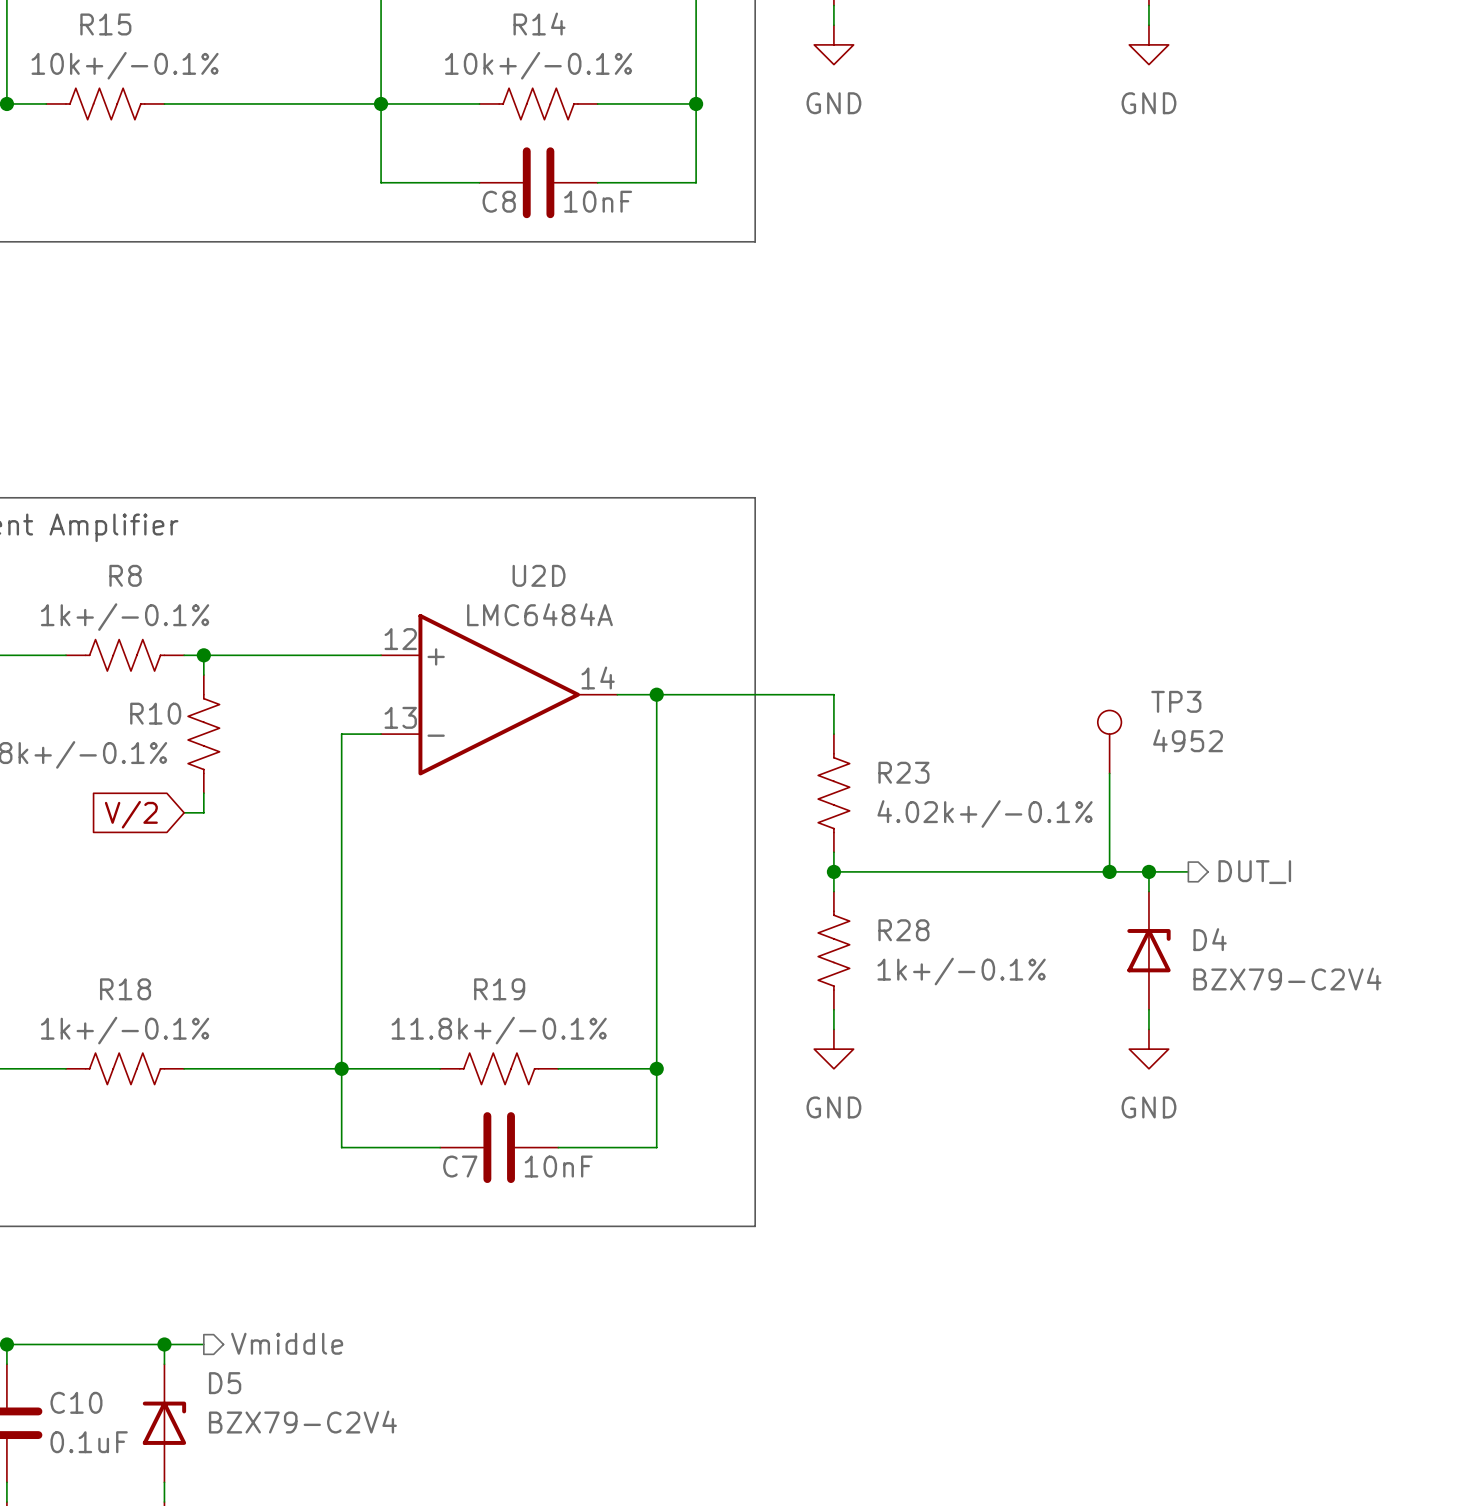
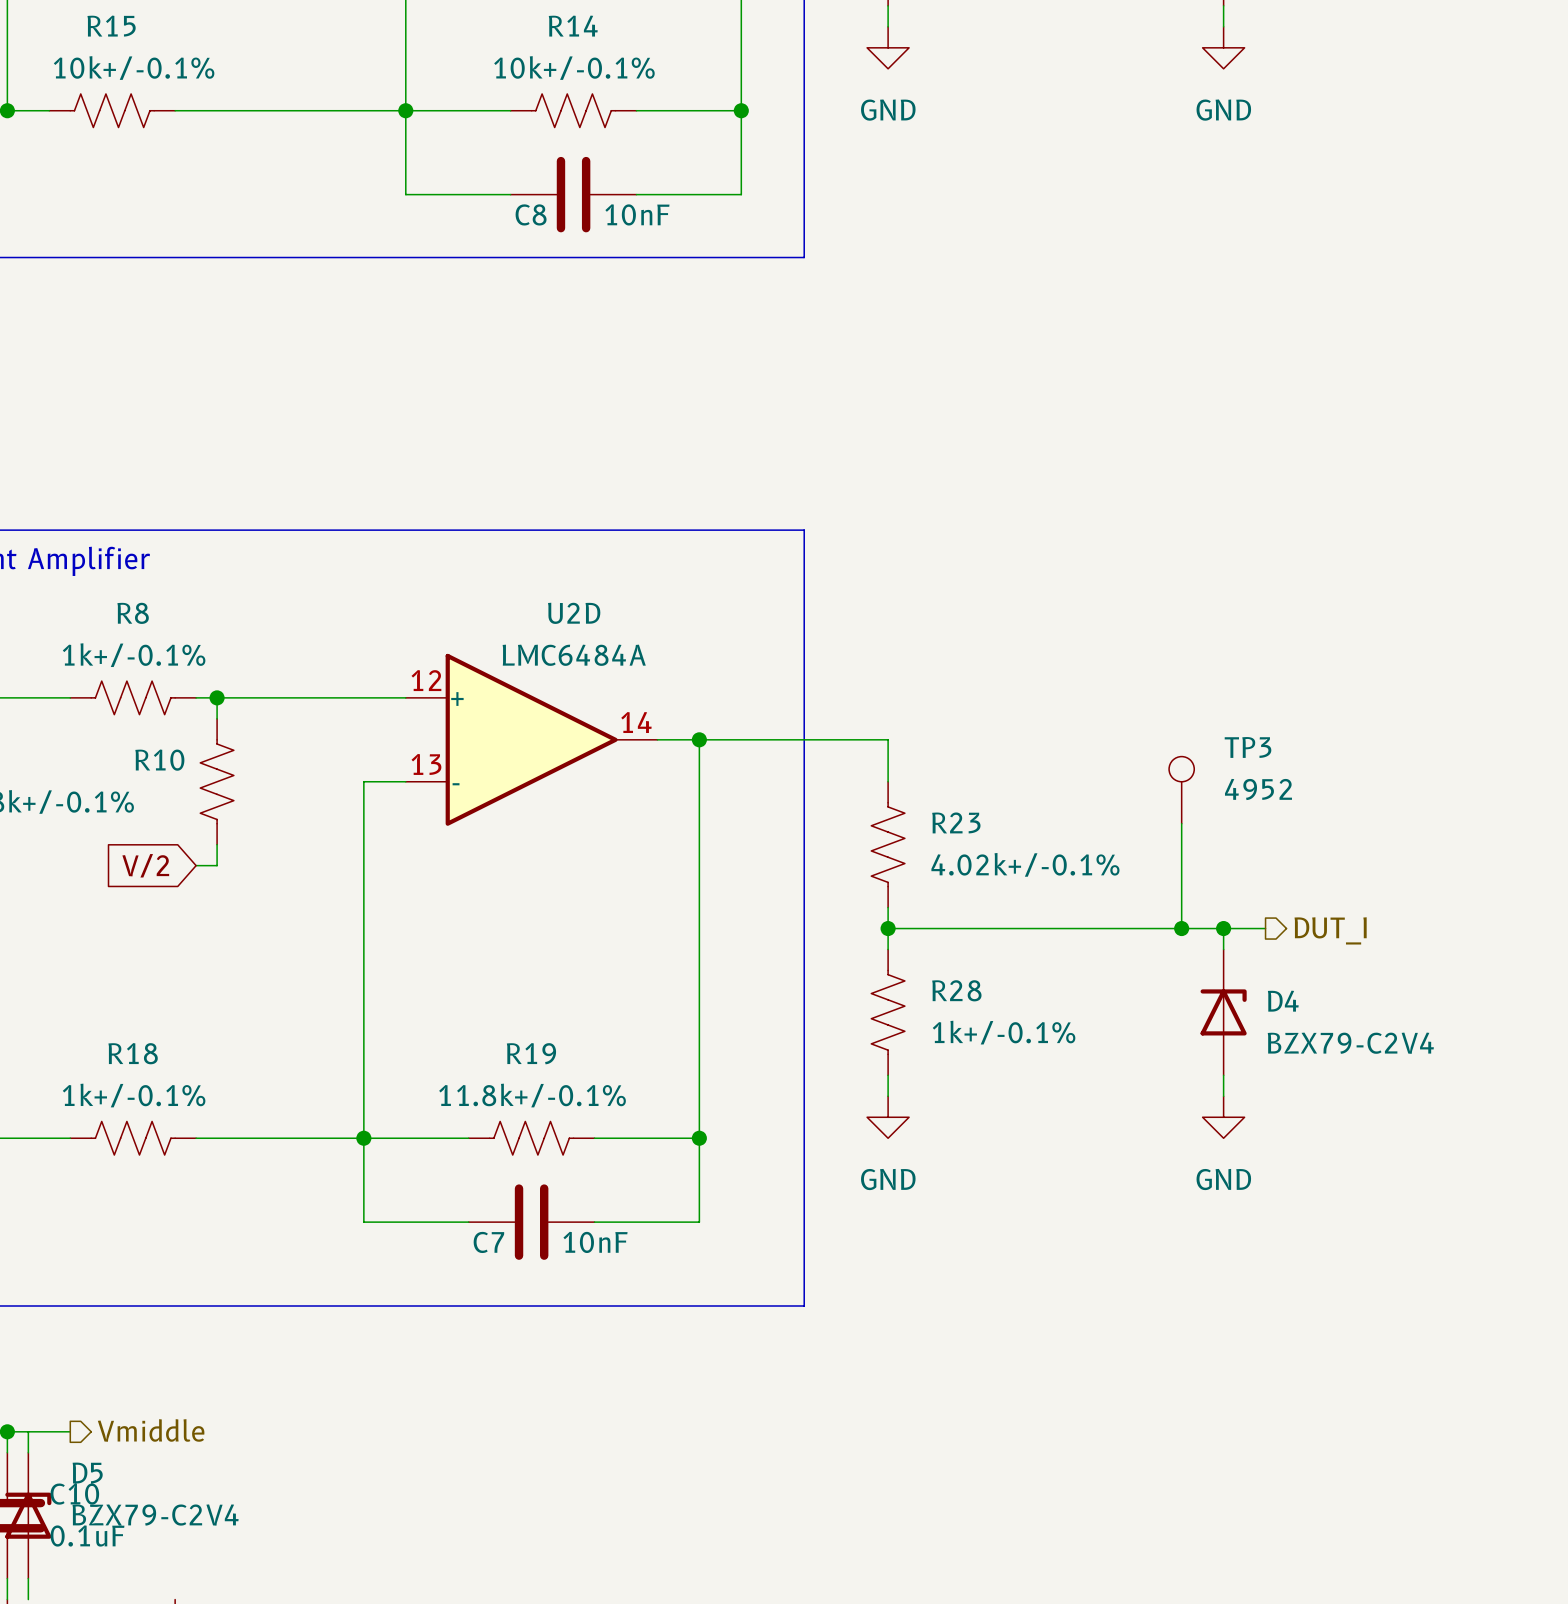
hierarchical label position: Vmiddle (287, 1343) -> Vmiddle (151, 1430)
wire: (66, 1344) (203, 1344) -> none
wire: (164, 1344) (164, 1364) -> (28, 1431) (28, 1452)
junction: (164, 1344) -> none
D5 position: (164, 1423) -> (28, 1515)
wire: (164, 1482) (164, 1502) -> (28, 1578) (28, 1599)

